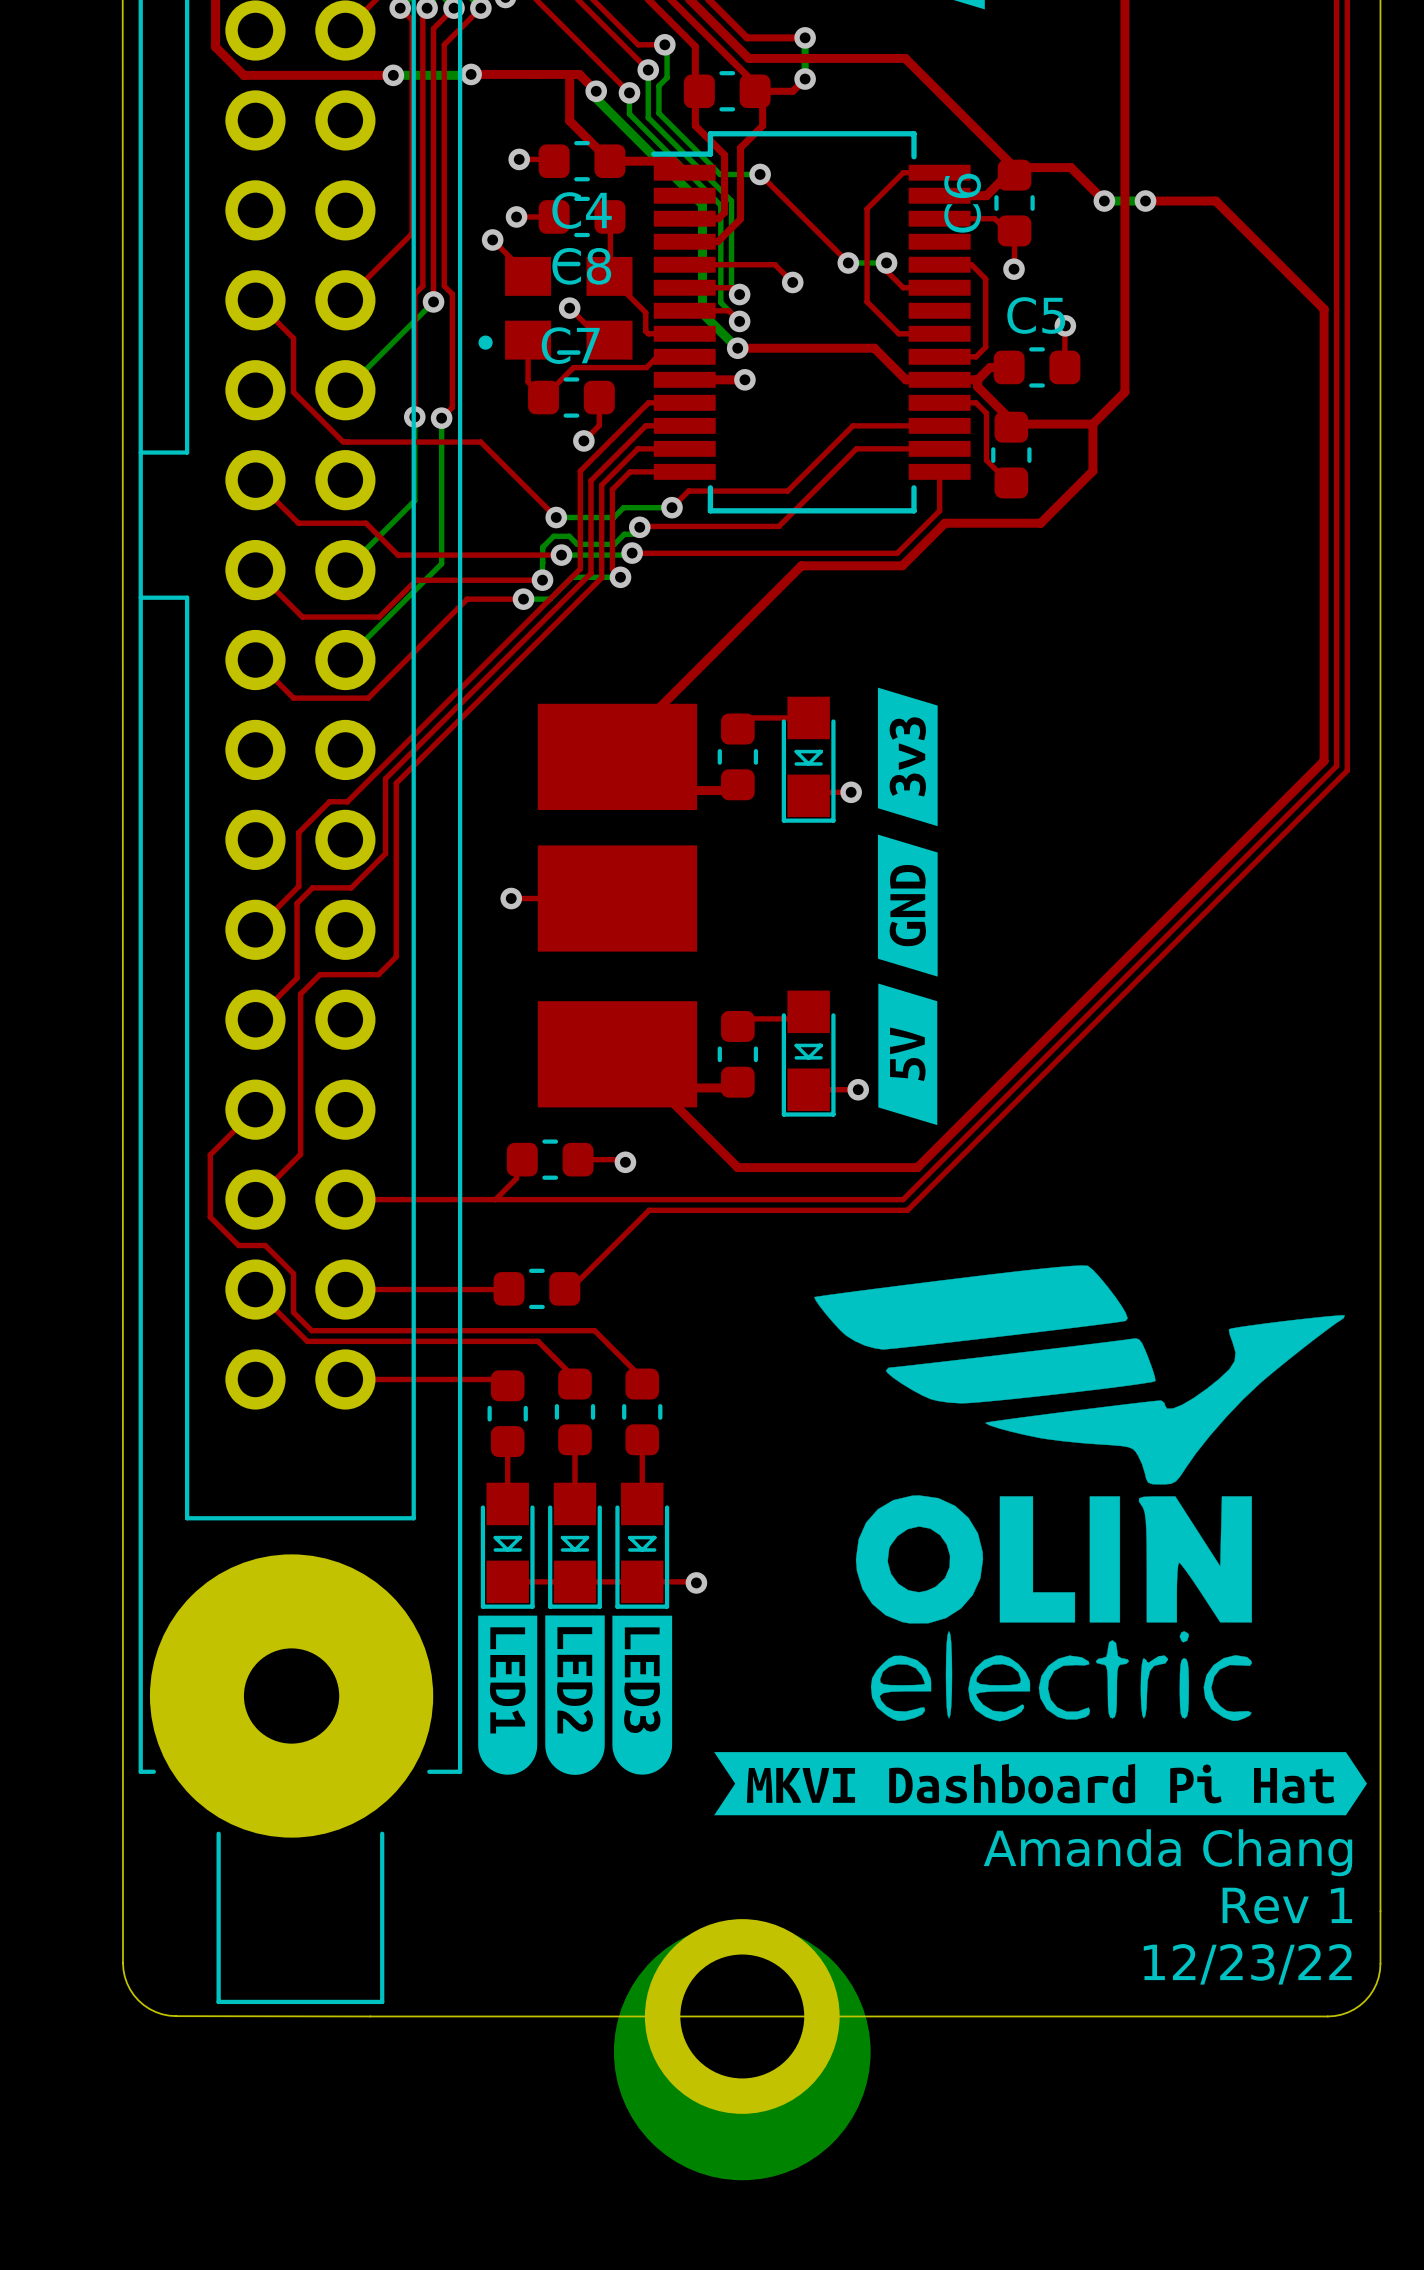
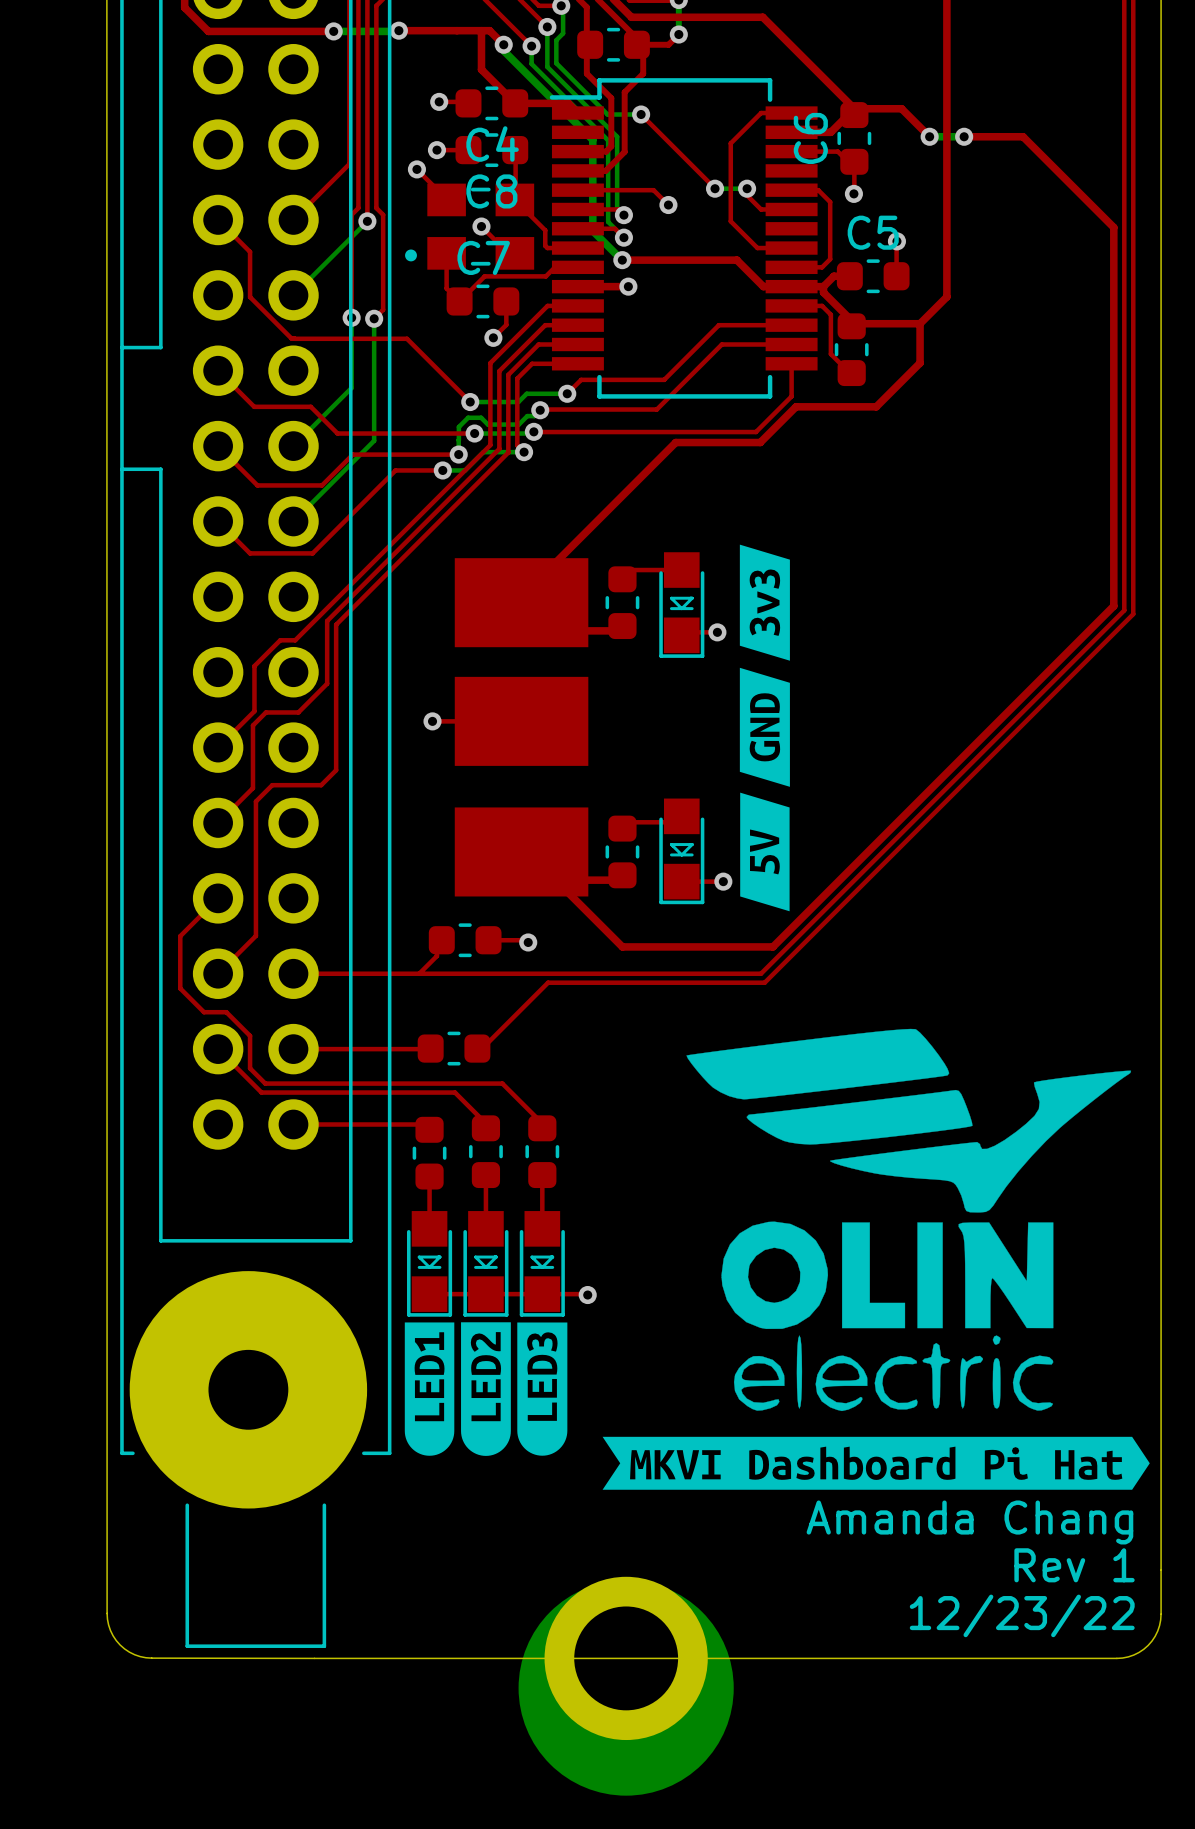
drawing shape: [478, 1615, 538, 1775] -> [404, 1322, 455, 1456]
drawing shape: [545, 1615, 605, 1775] -> [461, 1322, 511, 1456]
drawing shape: [612, 1615, 673, 1775] -> [517, 1322, 568, 1456]

